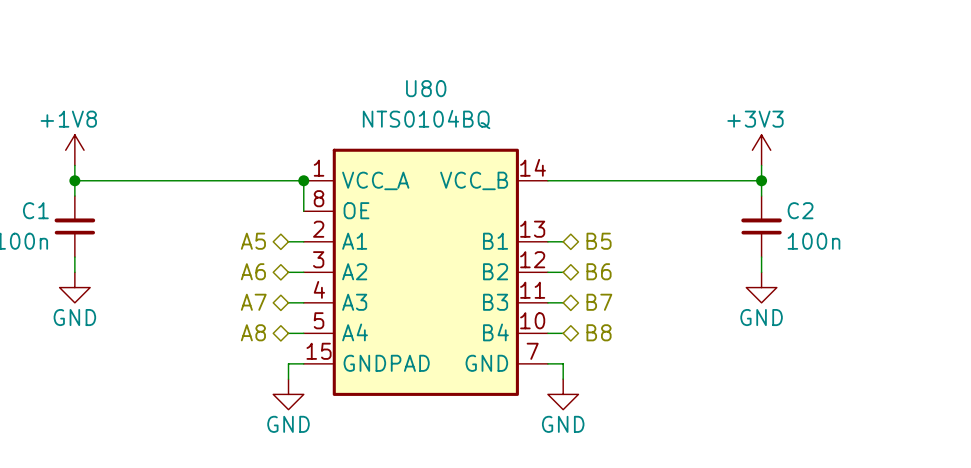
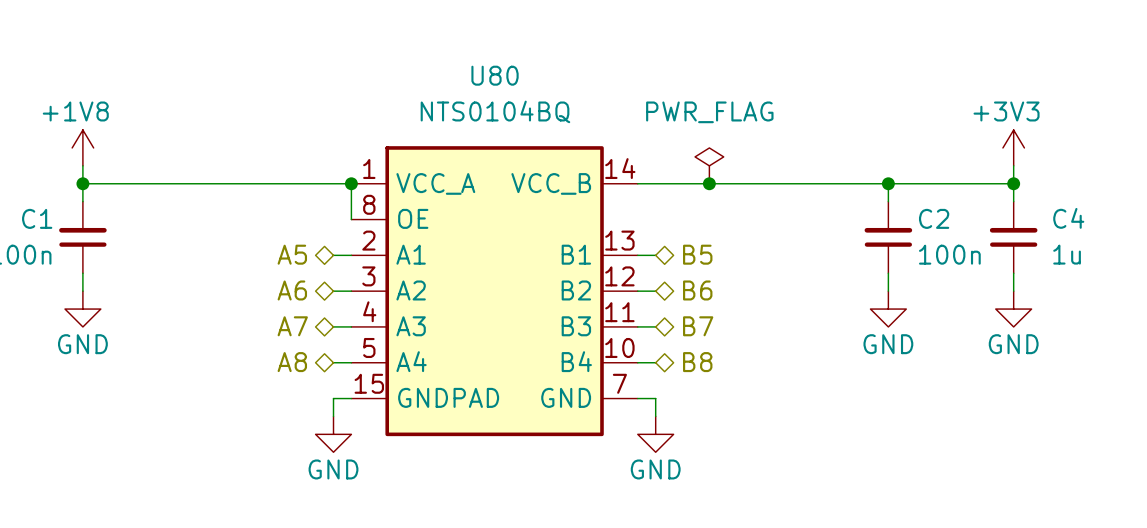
power symbol position: +3V3 (761, 150) -> +3V3 (1013, 147)
power symbol: none -> PWR_FLAG (709, 165)
wire: (761, 165) (761, 180) -> (1013, 183) (888, 183)
wire: none -> (1013, 165) (1013, 201)
junction: none -> (709, 183)
junction: none -> (1013, 183)
C4: none -> (1013, 237)
wire: none -> (1013, 273) (1013, 291)
power symbol: none -> GND (1013, 309)

